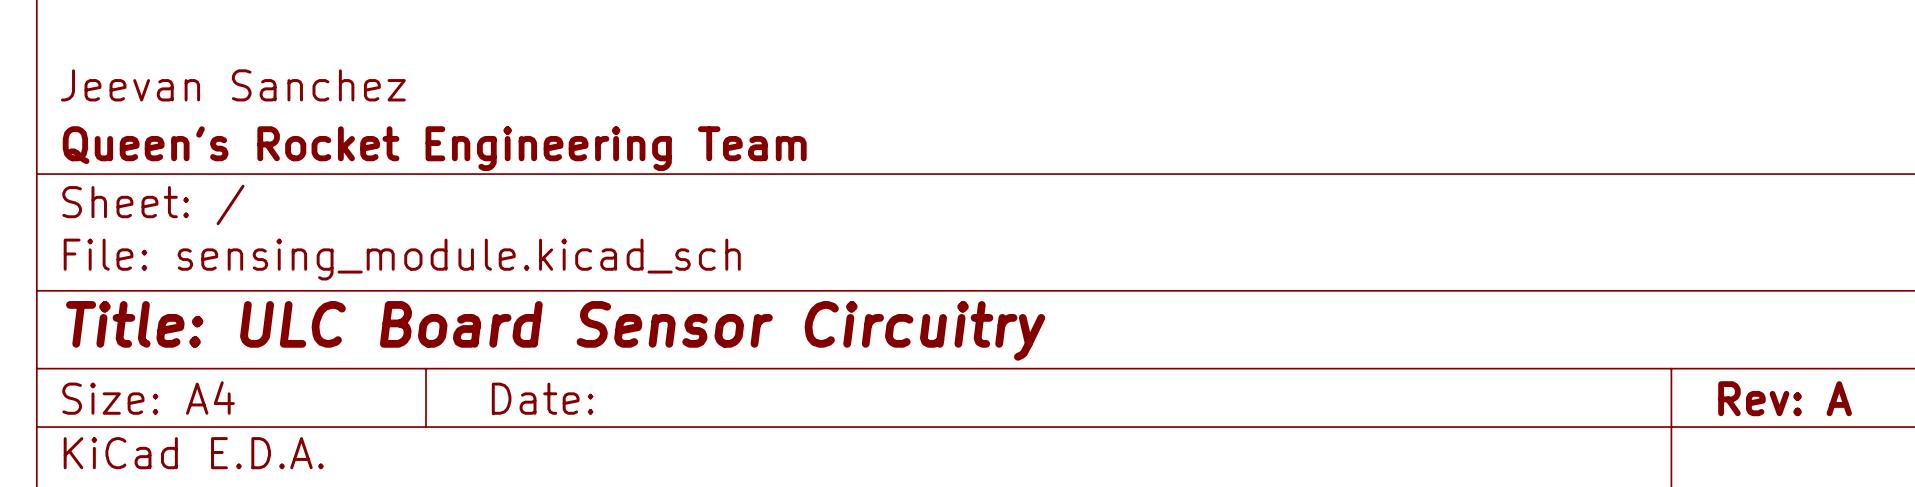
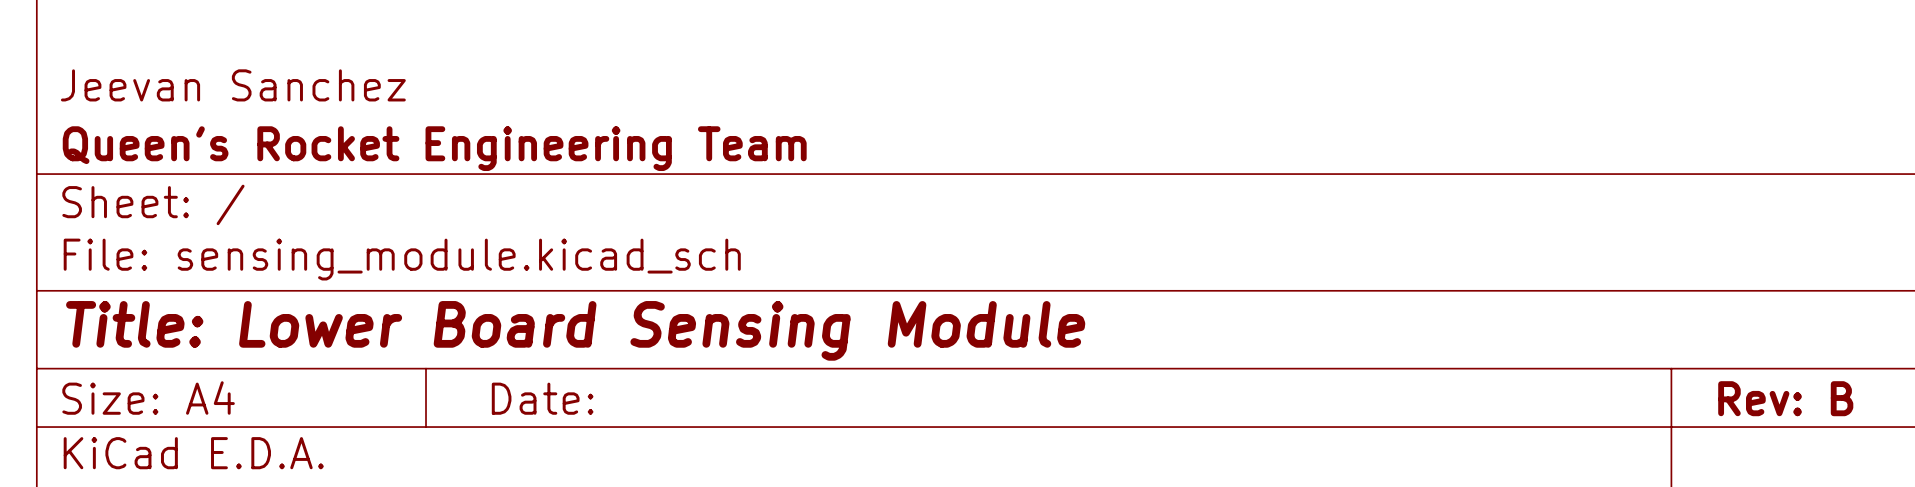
title block: Title: ULC Board Sensor Circuitry (555, 330) -> Title: Lower Board Sensing Module (575, 330)
title block: Rev: A (1785, 398) -> Rev: B (1785, 398)

